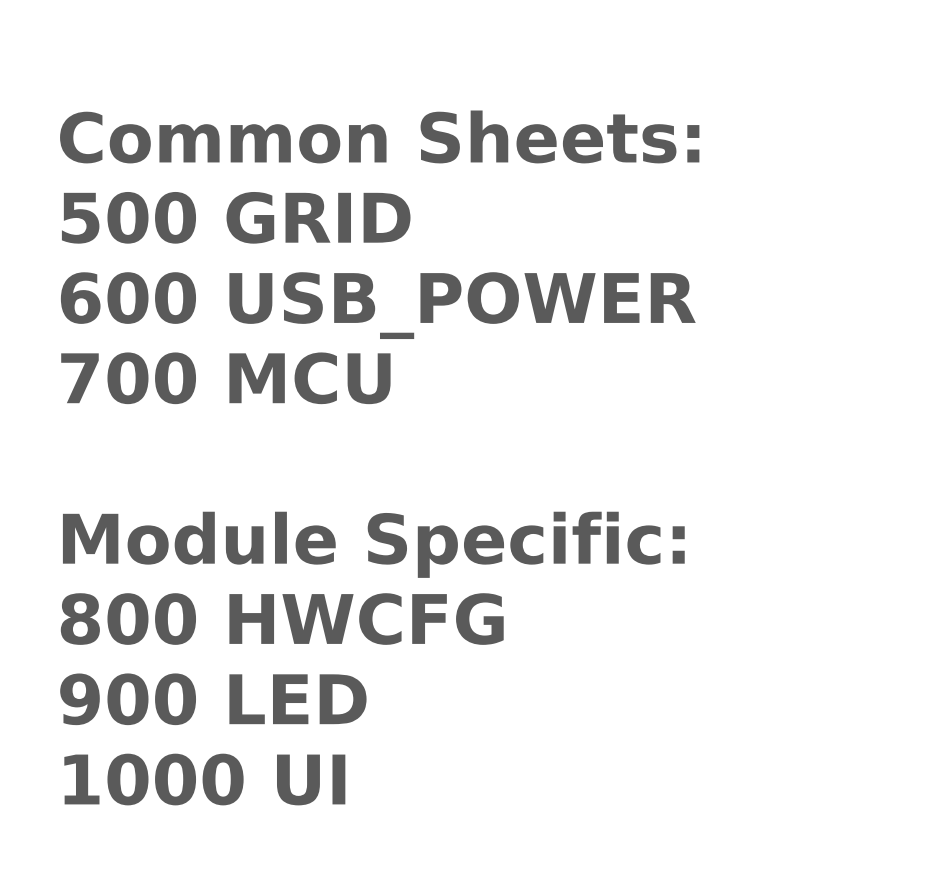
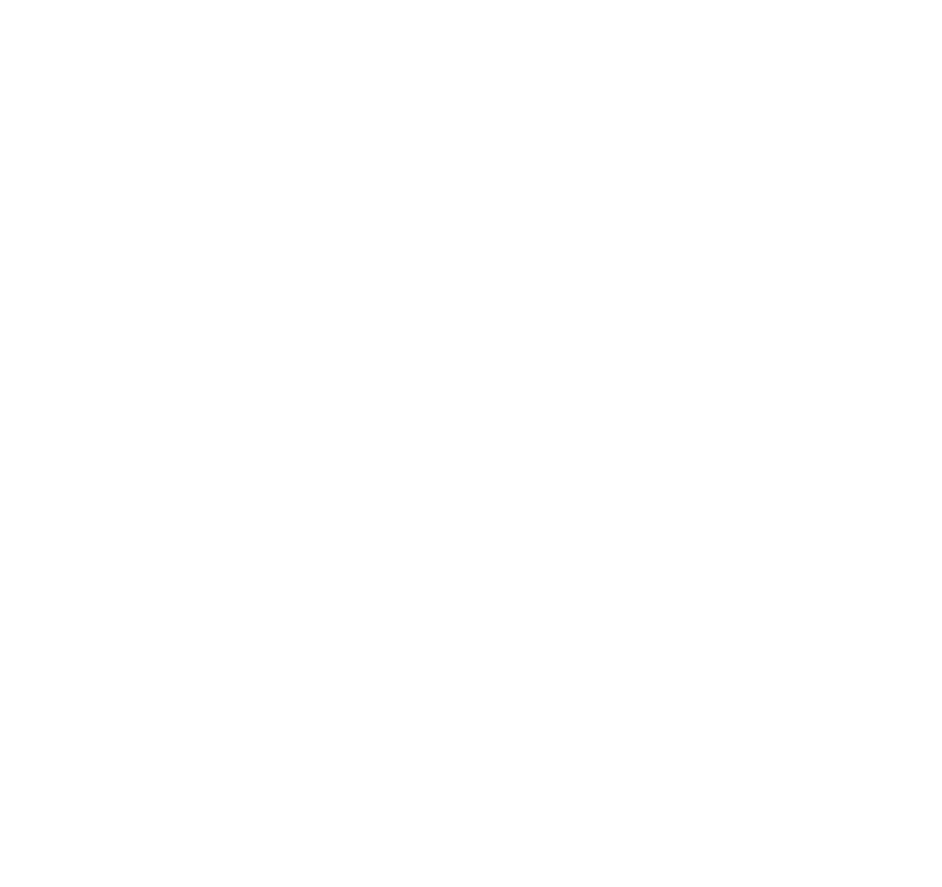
text: Common Sheets: (379, 136) -> none
text: 500 GRID (236, 217) -> none
text: 600 USB_POWER (378, 305) -> none
text: 700 MCU (225, 378) -> none
text: Module Specific: (373, 544) -> none
text: 800 HWCFG (282, 619) -> none
text: 900 LED (213, 699) -> none
text: 1000 UI (204, 779) -> none

